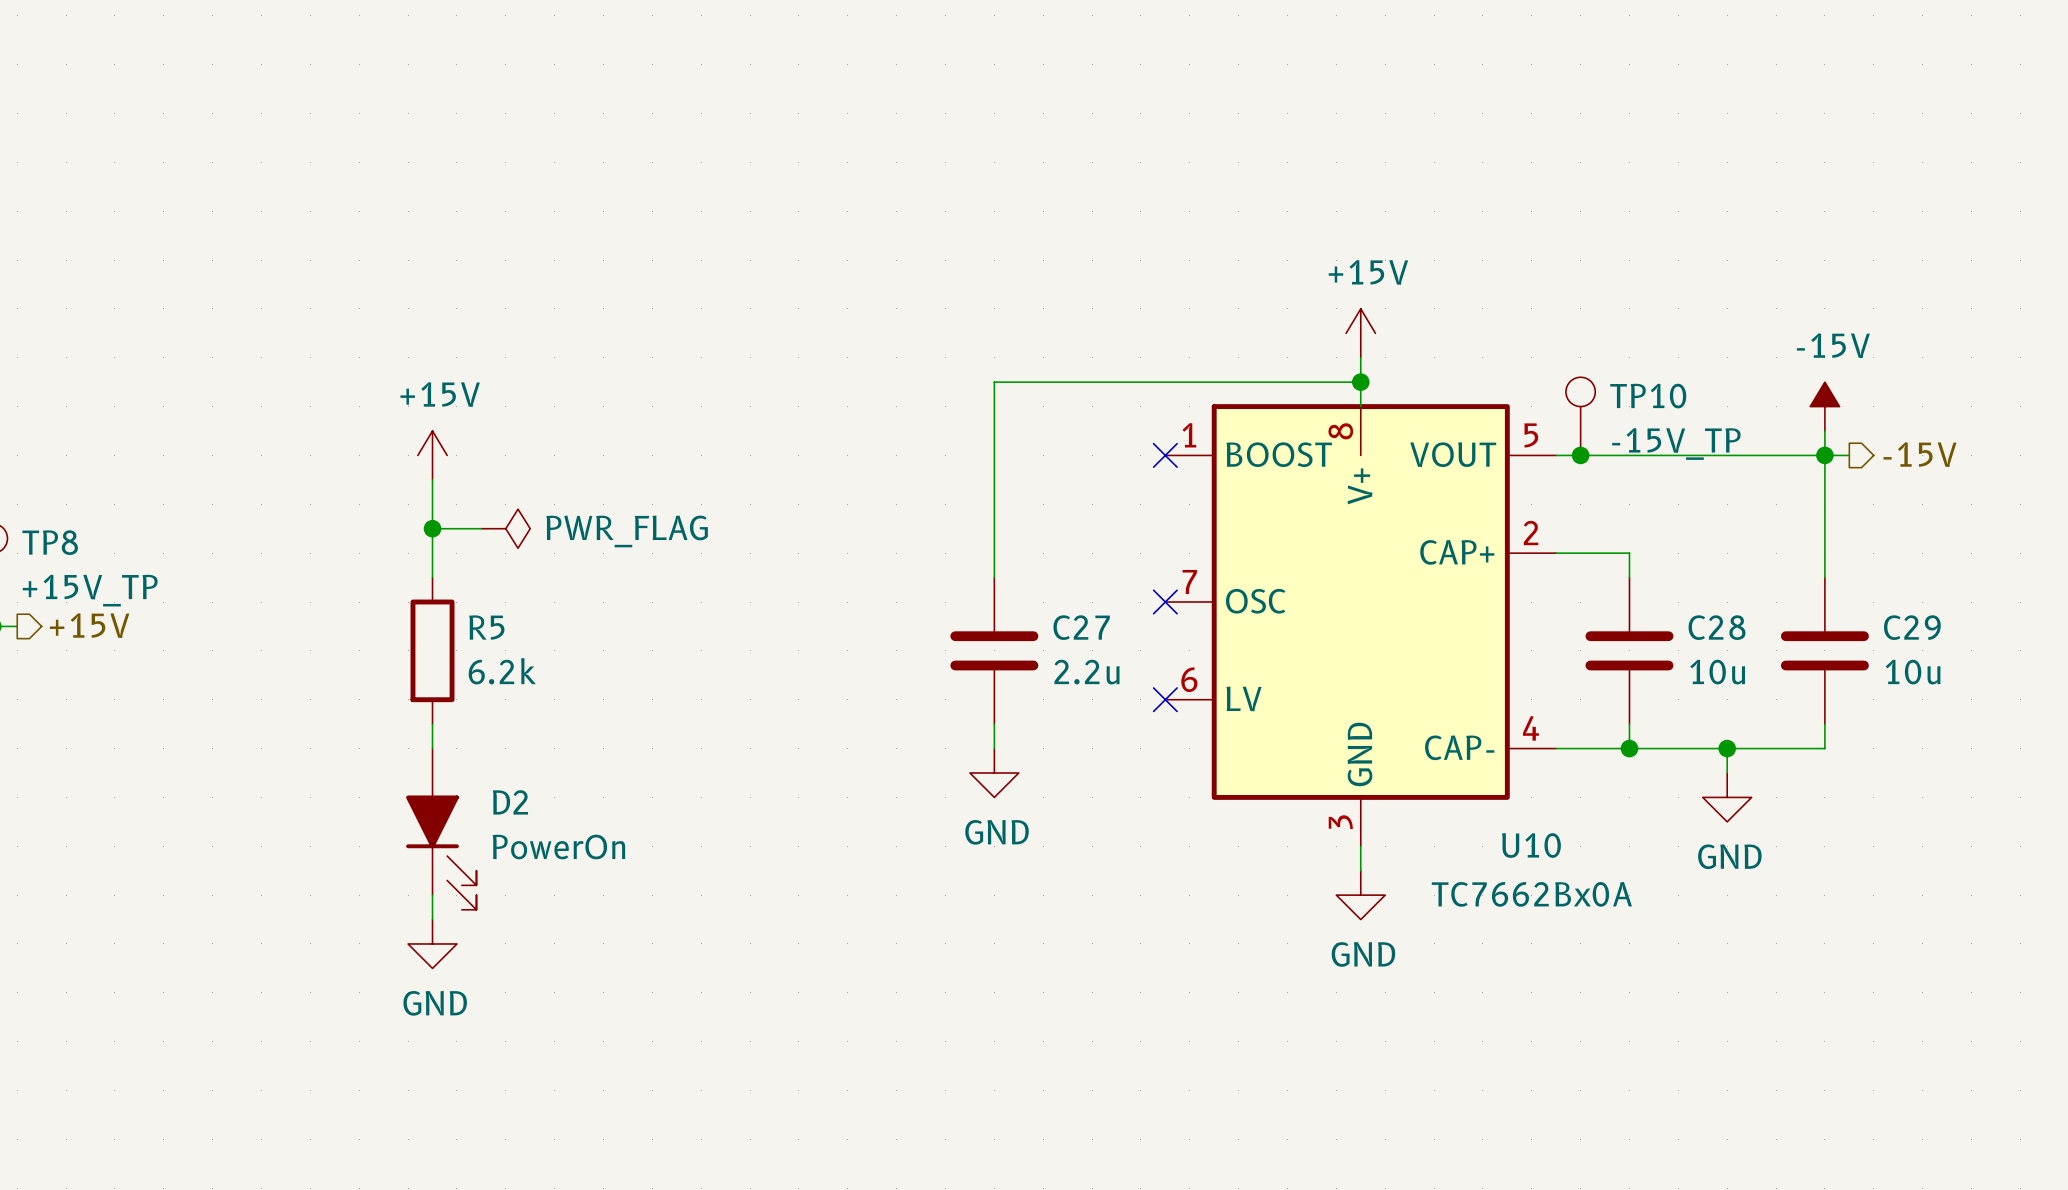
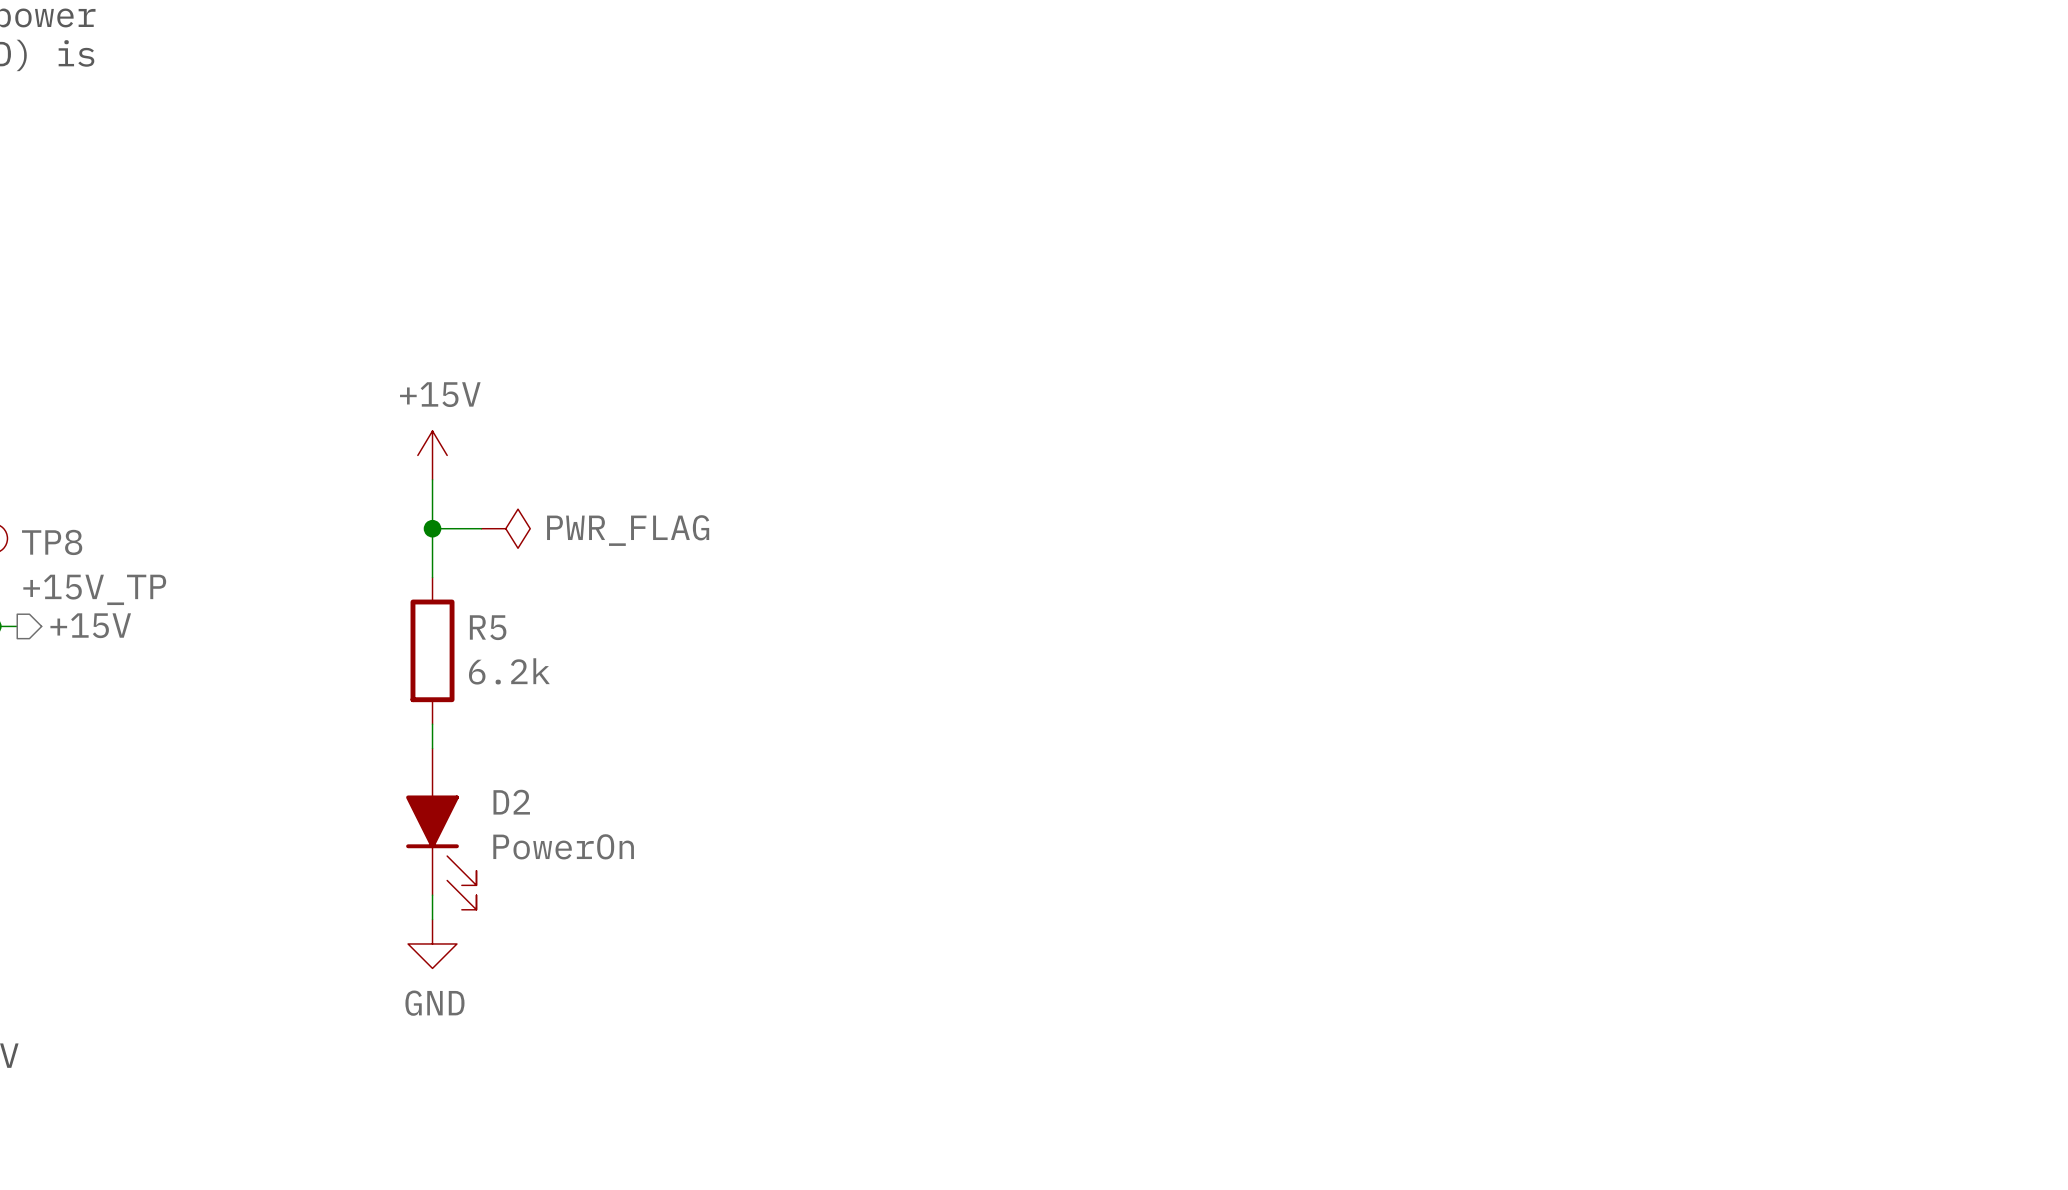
power symbol: +15V (1360, 333) -> none
wire: (1360, 357) (1360, 406) -> none
wire: (1360, 382) (994, 382) (994, 577) -> none
junction: (1360, 382) -> none
power symbol: -15V (1824, 406) -> none
TP10: -15V_TP (1580, 416) -> none
wire: (1824, 431) (1824, 577) -> none
hierarchical label: -15V (1920, 454) -> none
no-connect mark: (1165, 455) -> none
wire: (1556, 455) (1849, 455) -> none
junction: (1580, 455) -> none
junction: (1824, 455) -> none
wire: (1556, 553) (1629, 553) (1629, 577) -> none
no-connect mark: (1165, 602) -> none
U10: TC7662Bx0A (1360, 625) -> none
C27: 2.2u (994, 650) -> none
C28: 10u (1629, 650) -> none
C29: 10u (1824, 650) -> none
no-connect mark: (1165, 699) -> none
wire: (994, 724) (994, 748) -> none
wire: (1629, 724) (1629, 748) -> none
wire: (1824, 724) (1824, 748) (1556, 748) -> none
junction: (1629, 748) -> none
wire: (1727, 748) (1727, 772) -> none
junction: (1727, 748) -> none
power symbol: GND (994, 772) -> none
power symbol: GND (1727, 797) -> none
wire: (1360, 846) (1360, 870) -> none
power symbol: GND (1360, 895) -> none

